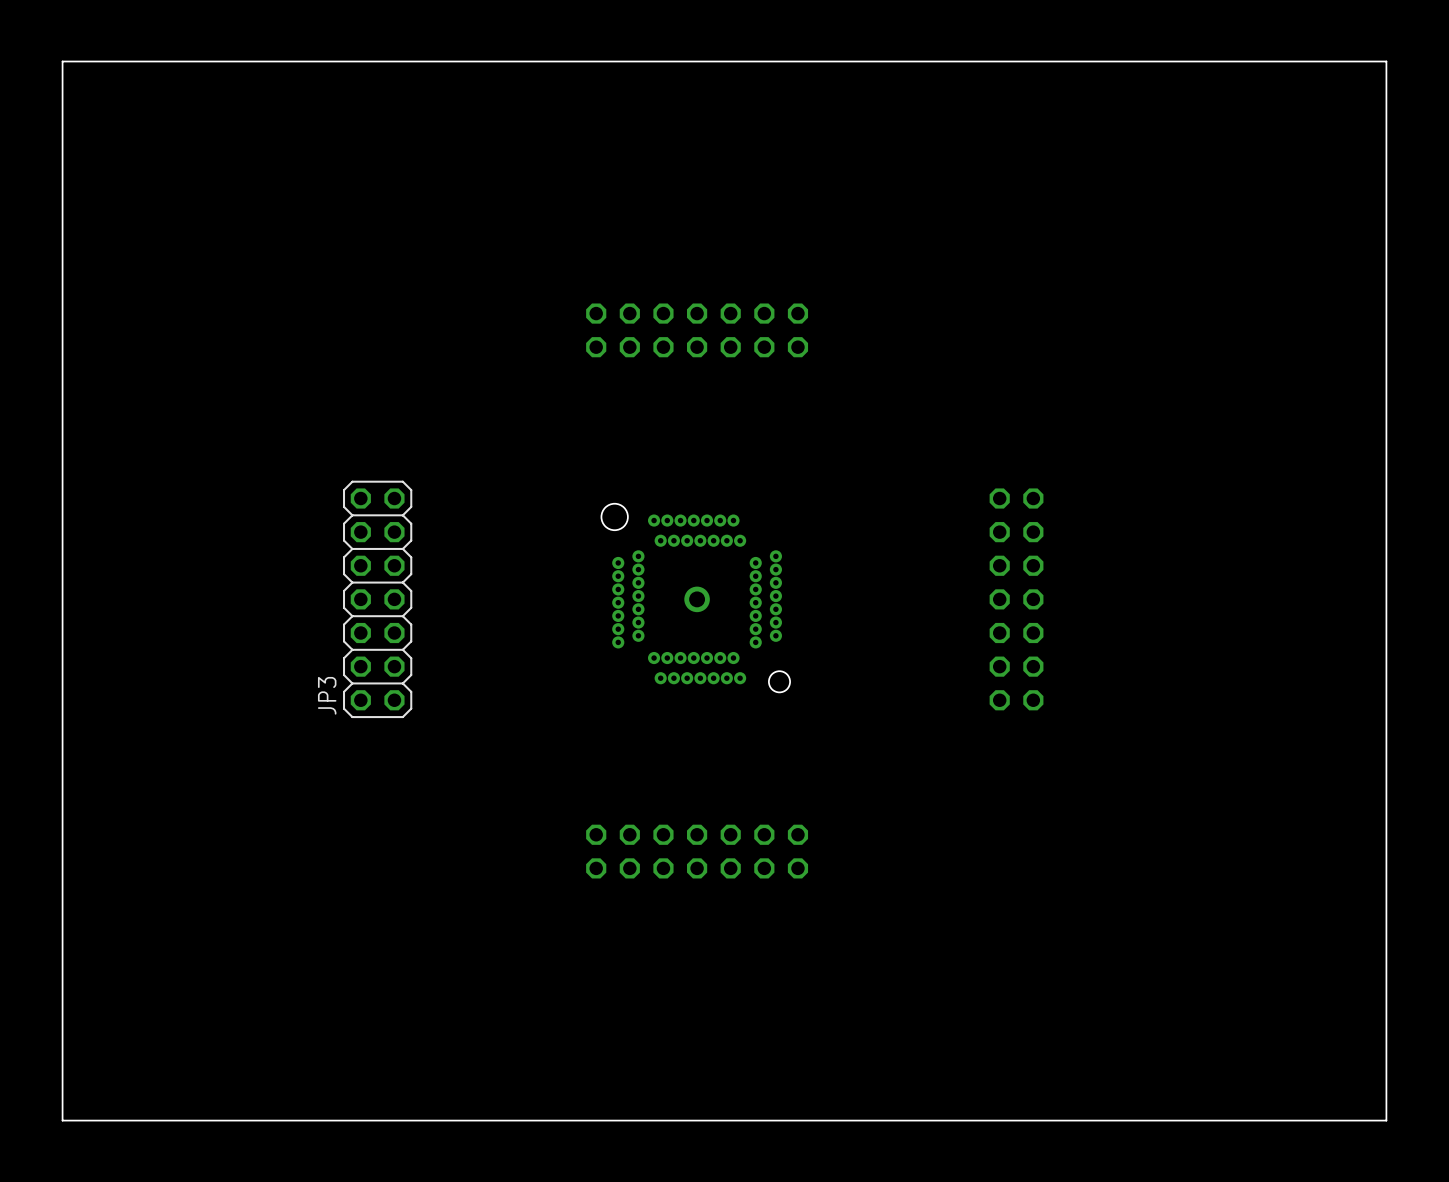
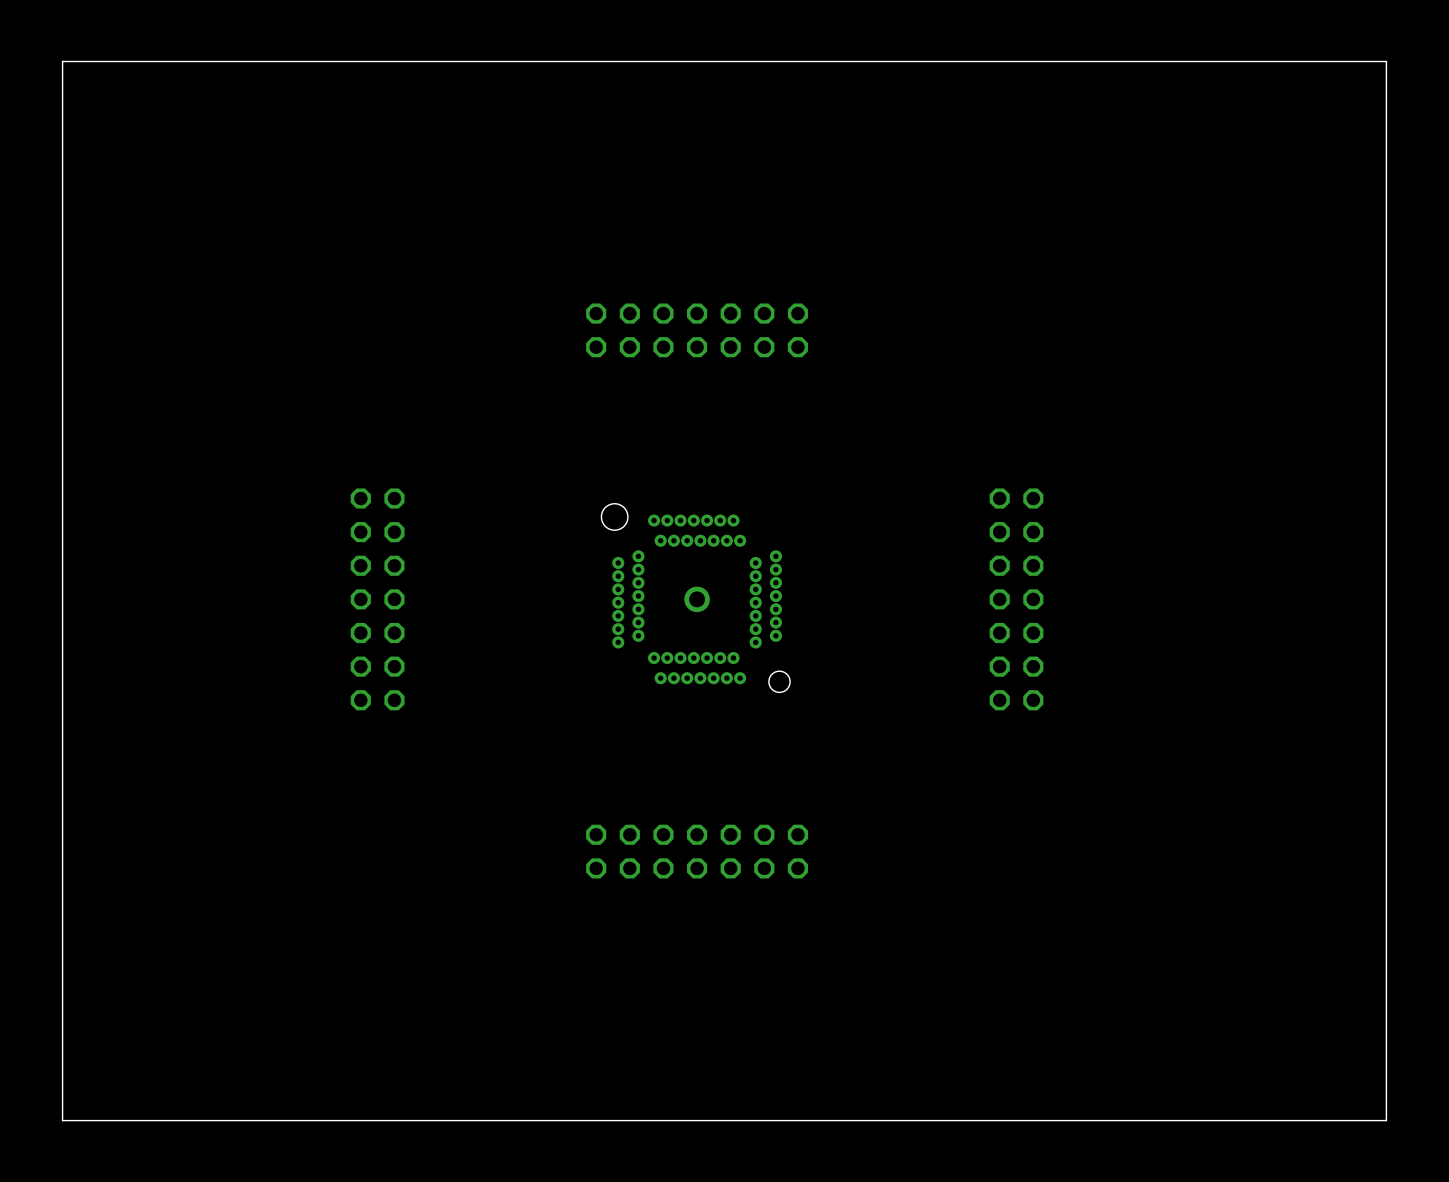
JP3 side: bottom (377, 599) -> top (377, 599)

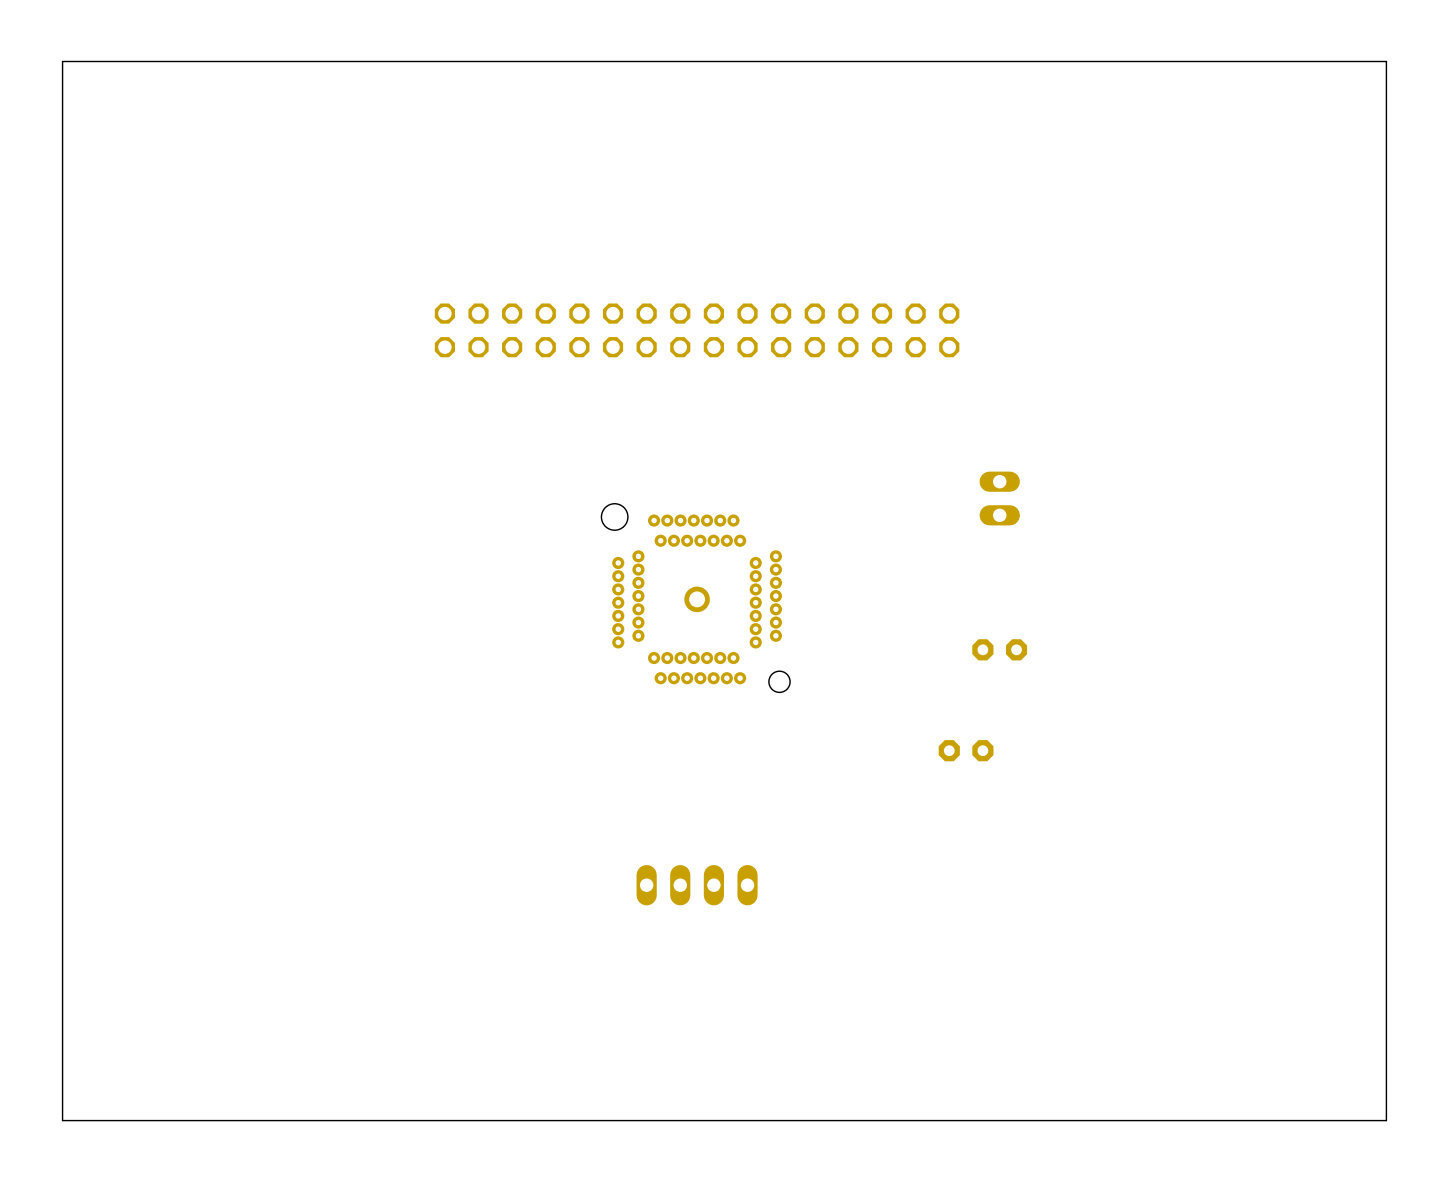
part footprint: [586, 303, 809, 358] -> [434, 303, 960, 358]
part: none -> (999, 498)
part: (377, 599) -> none
part: (1016, 599) -> none
part: none -> (999, 649)
part: none -> (966, 750)
part: (697, 851) -> none
part: none -> (697, 885)

